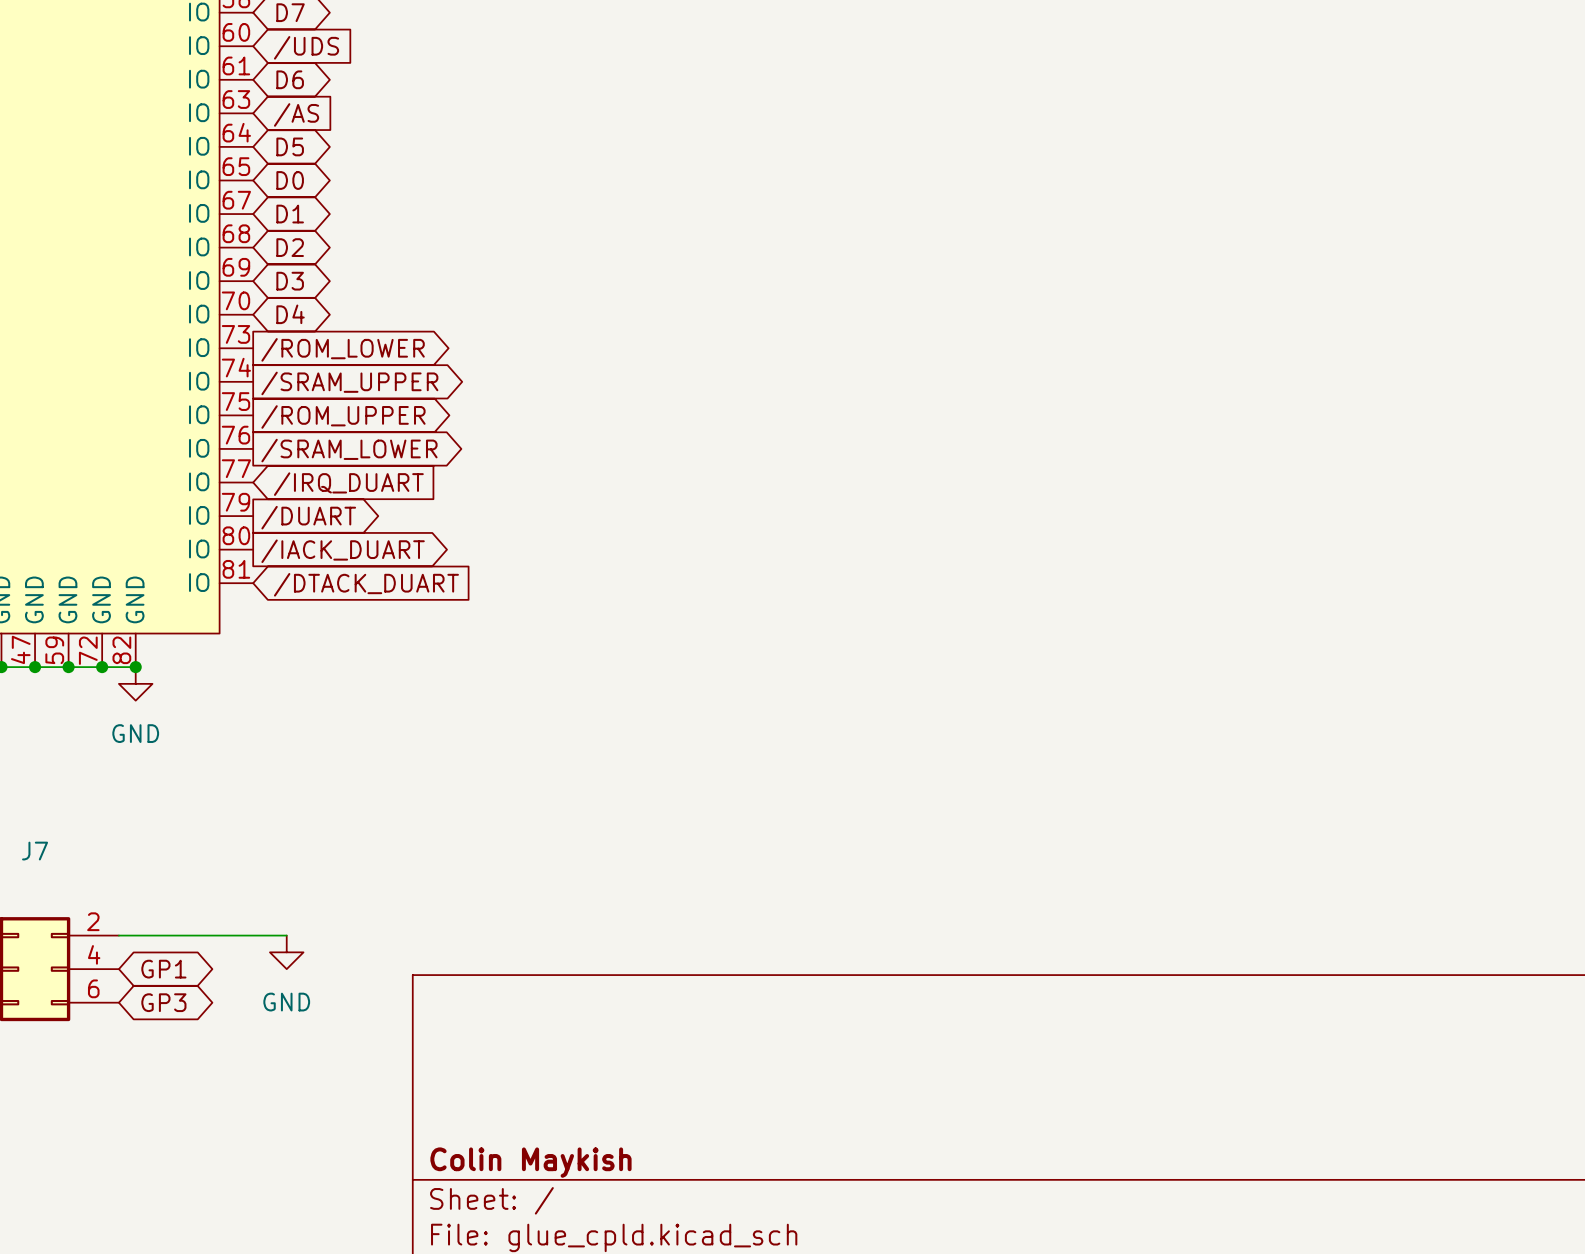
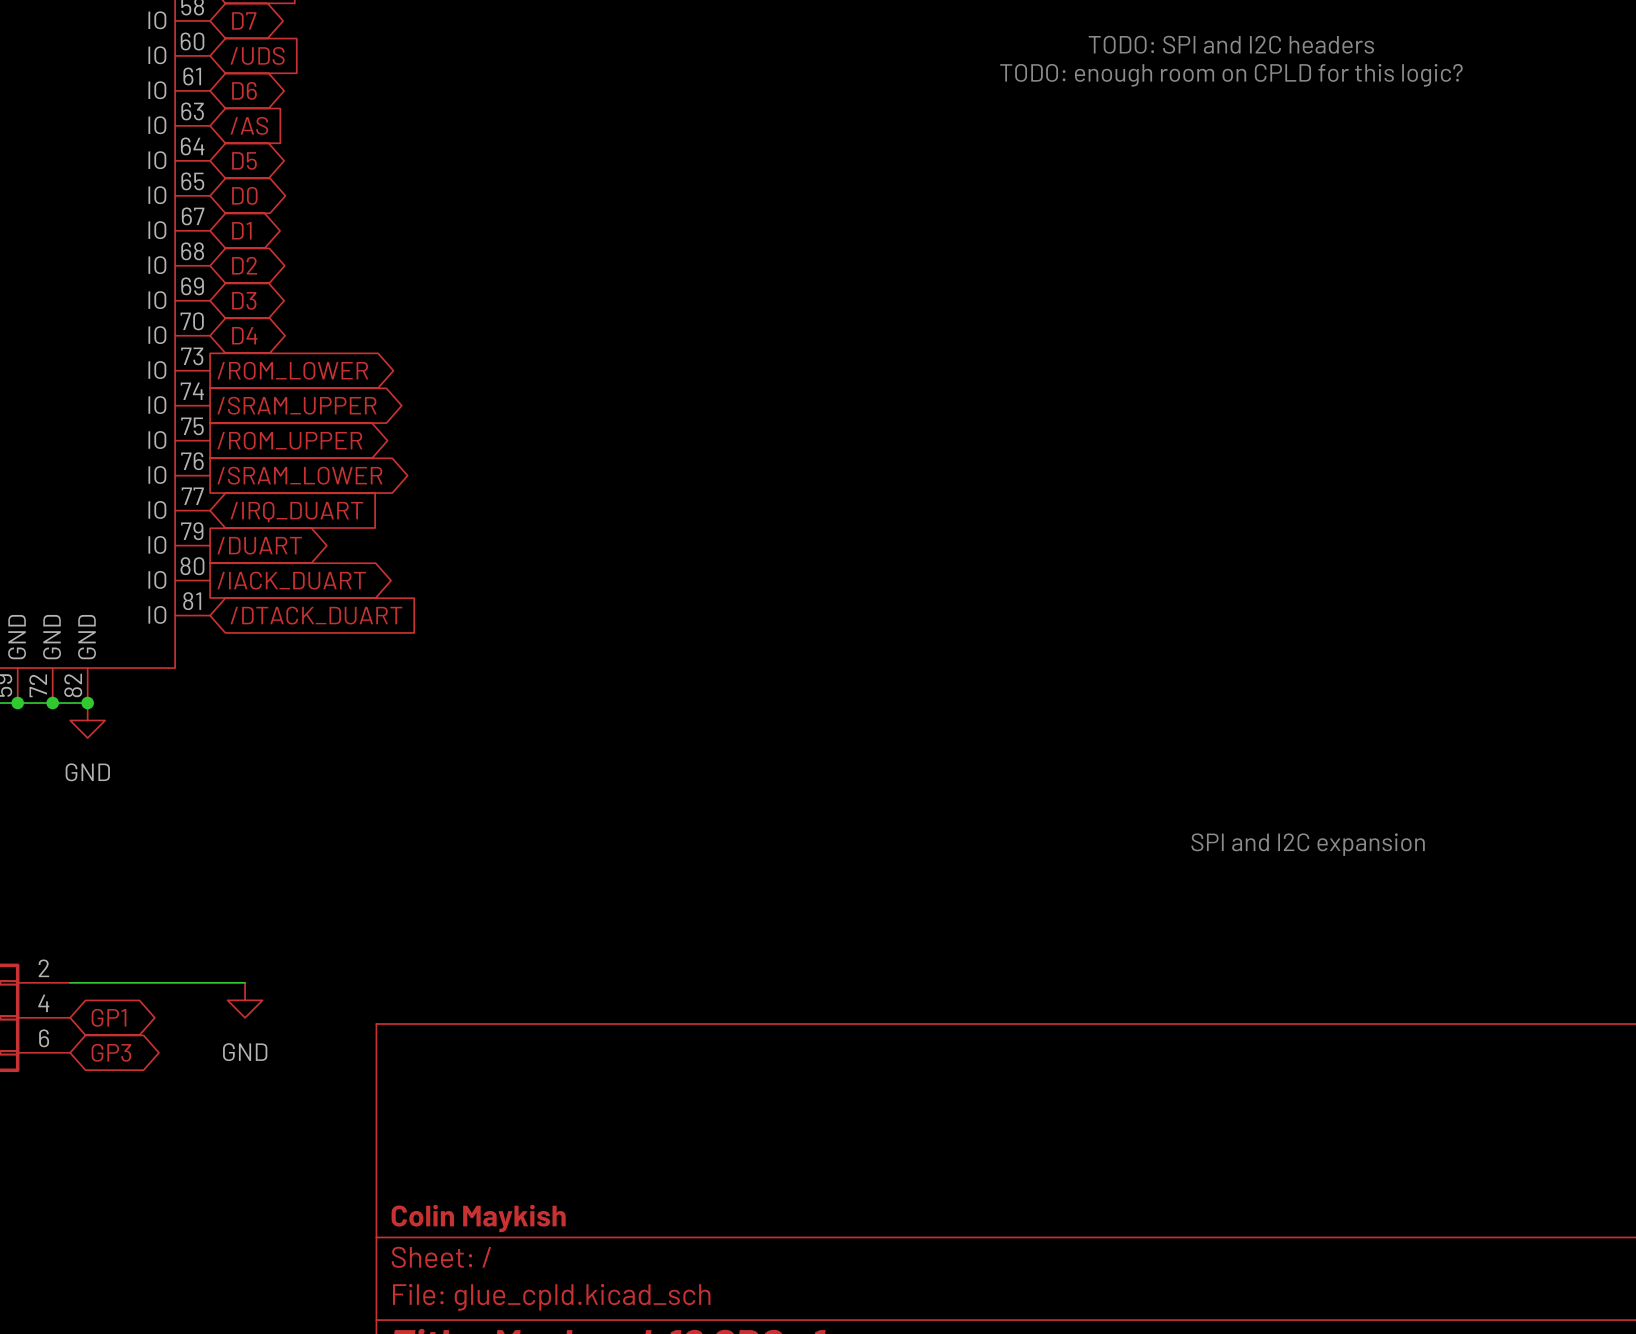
text: none -> TODO: SPI and I2C headers (1231, 44)
text: none -> TODO: enough room on CPLD for this logic? (1231, 75)
text: none -> SPI and I2C expansion (1308, 844)

